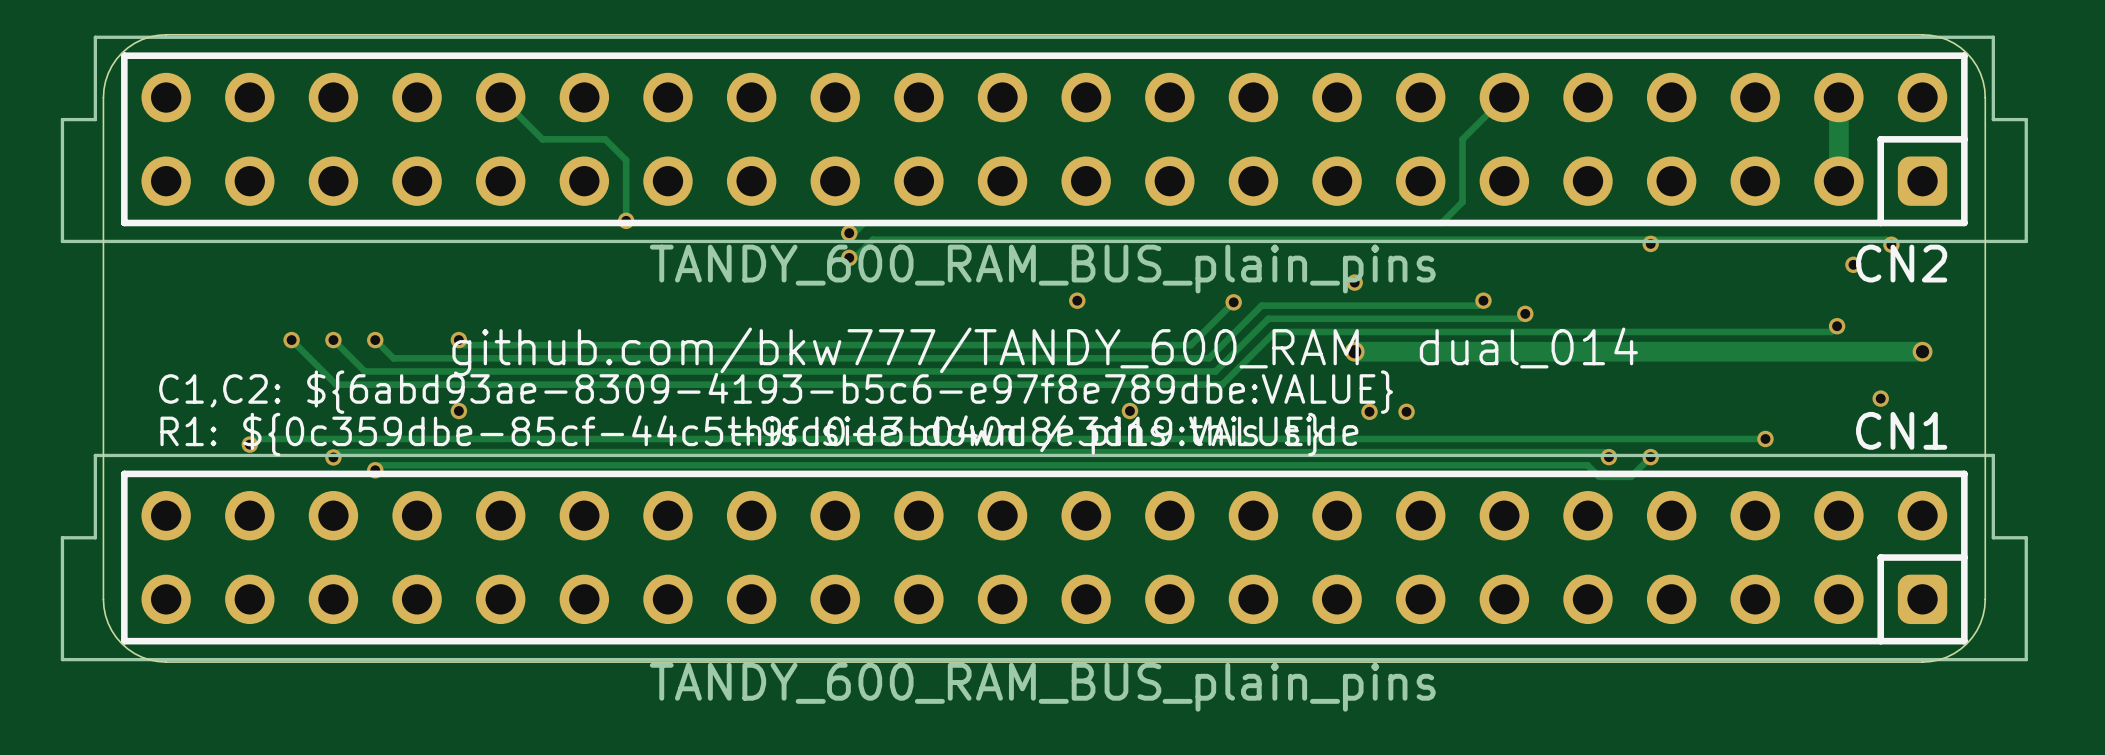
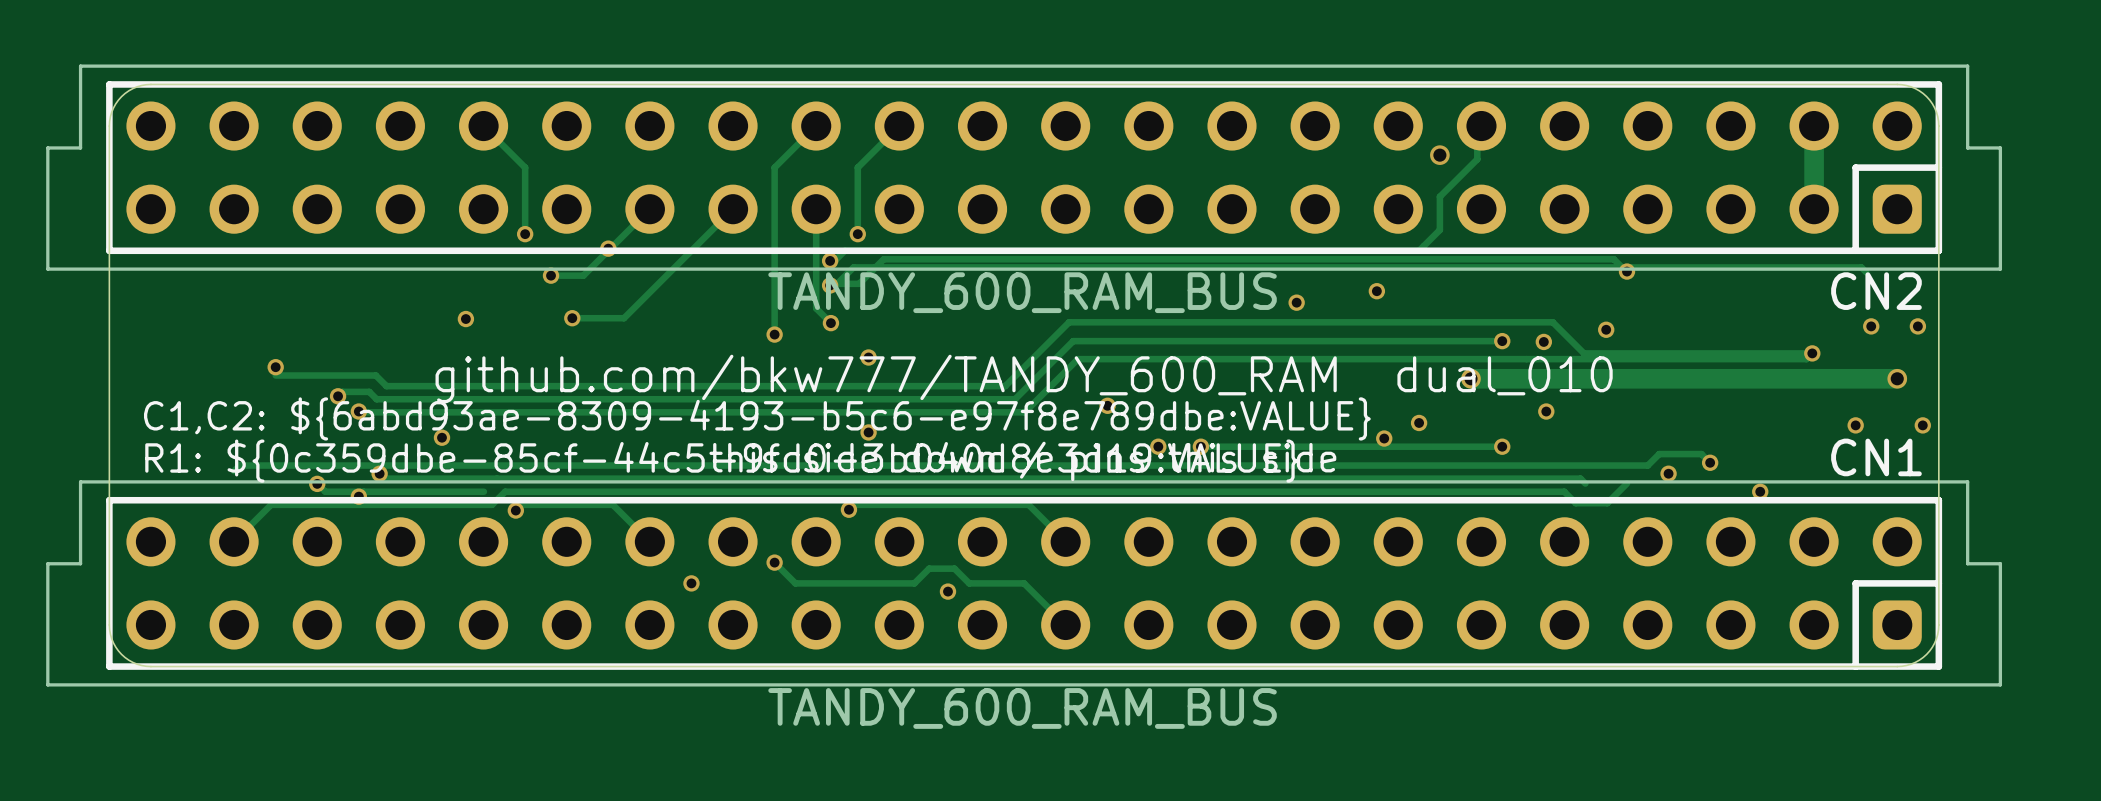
board edge: (1922, 34) (166, 34) (149, 36) (134, 43) (121, 53) (111, 66) (103, 89) (103, 599) (105, 615) (116, 637) (127, 649) (149, 659) (166, 662) (1922, 662) (1938, 659) (1953, 653) (1966, 643) (1980, 623) (1984, 607) (1985, 97) (1980, 73) (1966, 53) (1946, 39) (1922, 34) -> (1897, 84) (1915, 88) (1926, 96) (1934, 107) (1938, 126) (1938, 624) (1937, 634) (1932, 647) (1923, 657) (1910, 664) (1897, 666) (150, 666) (141, 665) (128, 660) (118, 650) (111, 638) (109, 624) (109, 126) (111, 112) (118, 100) (128, 90) (137, 86) (150, 84) (1897, 84)
track: none -> (816, 126) (774, 167) (774, 334)
track: none -> (899, 126) (857, 167) (857, 234)
track: (1500, 101) (1462, 139) (1462, 168) -> (1477, 130) (1477, 159) (1439, 196)
via: none -> (1439, 155)
track: (542, 139) (605, 139) (626, 160) (626, 220) -> (525, 167) (525, 234)
track: none -> (649, 209) (583, 275) (551, 275)
track: none -> (733, 209) (624, 318) (572, 318)
track: none -> (816, 209) (816, 308) (830, 323)
via: none -> (525, 234)
via: none -> (857, 234)
track: none -> (1626, 272) (1613, 259) (883, 259) (859, 283) (837, 283)
via: (1891, 244) -> none
via: none -> (551, 275)
via: none -> (1376, 291)
via: (1853, 264) -> none
CN2 value: TANDY_600_RAM_BUS_plain_pins (1042, 269) -> TANDY_600_RAM_BUS (1022, 292)
via: none -> (1296, 302)
via: (1354, 282) -> none
via: none -> (572, 318)
via: none -> (465, 319)
via: none -> (830, 323)
via: none -> (1871, 326)
via: none -> (1917, 326)
via: (1077, 300) -> none
track: (1483, 300) (1478, 305) (1261, 305) (1208, 358) (393, 358) (375, 340) -> none
via: (1483, 300) -> none
track: (1233, 302) (1190, 345) (463, 345) (458, 340) -> none
via: (1233, 302) -> none
via: none -> (1606, 329)
via: none -> (774, 334)
track: (1525, 313) (1520, 318) (1268, 318) (1215, 371) (364, 371) (333, 340) -> (1502, 341) (1073, 341) (1015, 399) (376, 399) (369, 391) (342, 391) (338, 396)
via: none -> (1543, 341)
track: none -> (1812, 353) (1583, 353) (1552, 322) (1069, 322) (1005, 386) (386, 386) (375, 375) (275, 375)
via: none -> (868, 357)
track: (1274, 331) (1222, 384) (336, 384) (291, 340) -> (1253, 359) (1077, 359) (1024, 412) (358, 411)
via: (333, 340) -> none
via: (375, 340) -> none
via: (458, 340) -> none
text: github.com/bkw777/TANDY_600_RAM dual_014 (1045, 351) -> github.com/bkw777/TANDY_600_RAM dual_010 (1024, 378)
via: (1354, 351) -> none
track: (1493, 351) (1354, 351) -> none
via: none -> (1470, 378)
via: none -> (338, 396)
via: none -> (1107, 405)
via: none -> (358, 411)
via: none -> (1546, 411)
via: none -> (1419, 422)
via: none -> (1922, 425)
via: none -> (868, 432)
via: (1129, 411) -> none
via: (1369, 411) -> none
via: none -> (1158, 446)
via: none -> (1200, 446)
track: none -> (1502, 446) (1200, 446)
via: none -> (1502, 446)
via: none -> (1710, 462)
track: (1765, 438) (1671, 438) -> (1710, 462) (1701, 454) (1659, 454) (1647, 465)
via: (1765, 438) -> none
via: (249, 444) -> none
via: none -> (379, 473)
via: none -> (1668, 473)
track: (401, 452) (338, 452) (333, 457) -> (363, 491) (325, 491) (317, 483)
via: (1608, 457) -> none
via: (1650, 457) -> none
track: (522, 465) (501, 465) -> (505, 491) (492, 504) (271, 504) (234, 541)
via: none -> (1760, 491)
track: none -> (848, 509) (853, 504) (1028, 504) (1065, 541)
via: none -> (848, 509)
track: none -> (515, 510) (521, 504) (612, 504) (649, 541)
via: none -> (515, 510)
track: none -> (774, 562) (795, 583) (914, 583) (929, 568) (954, 568) (969, 583) (1024, 583) (1065, 624)
via: none -> (774, 562)
via: none -> (691, 583)
via: none -> (947, 591)
CN1 value: TANDY_600_RAM_BUS_plain_pins (1042, 687) -> TANDY_600_RAM_BUS (1022, 708)

